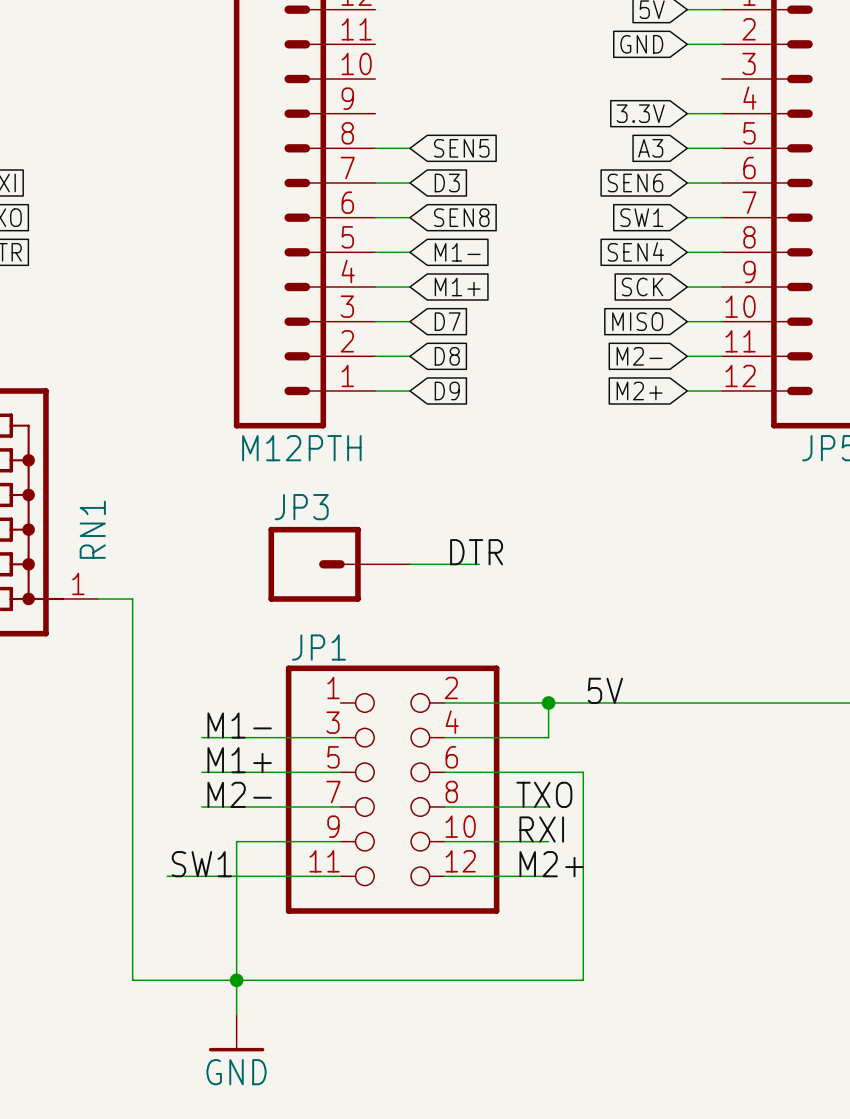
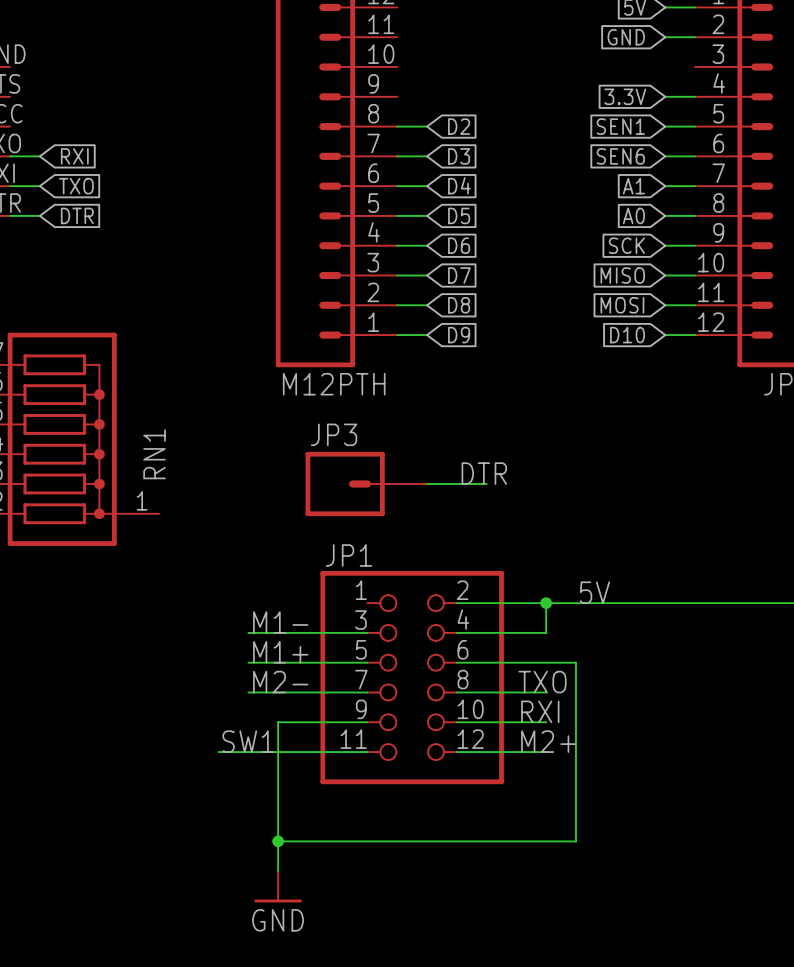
global label: SEN5 (461, 148) -> D2 (459, 126)
global label: A3 (650, 148) -> SEN1 (620, 126)
global label: SEN8 (461, 217) -> D4 (459, 185)
global label: SW1 (641, 217) -> A1 (633, 186)
global label: SEN4 (635, 251) -> A0 (633, 215)
global label: M1- (457, 252) -> D5 (459, 215)
global label: M1+ (457, 286) -> D6 (459, 245)
global label: M2- (639, 356) -> MOSI (622, 305)
global label: M2+ (639, 390) -> D10 (627, 335)
wire: (97, 598) (132, 598) (132, 980) (236, 980) -> none

